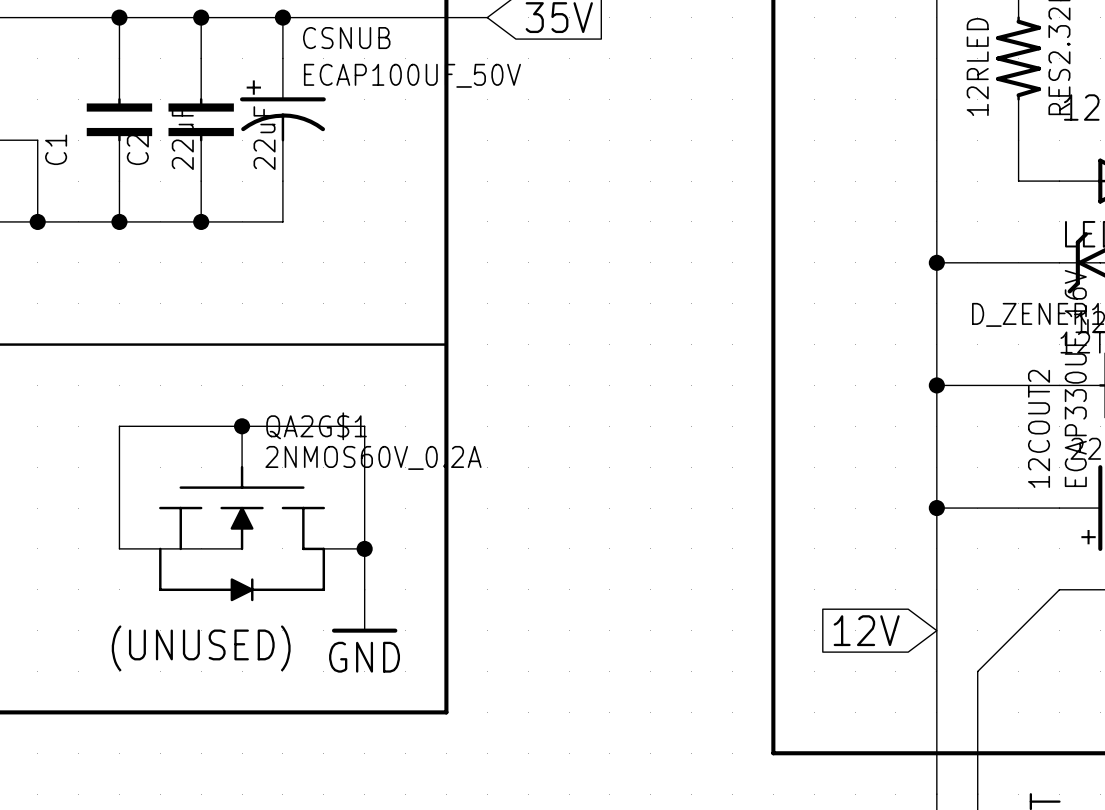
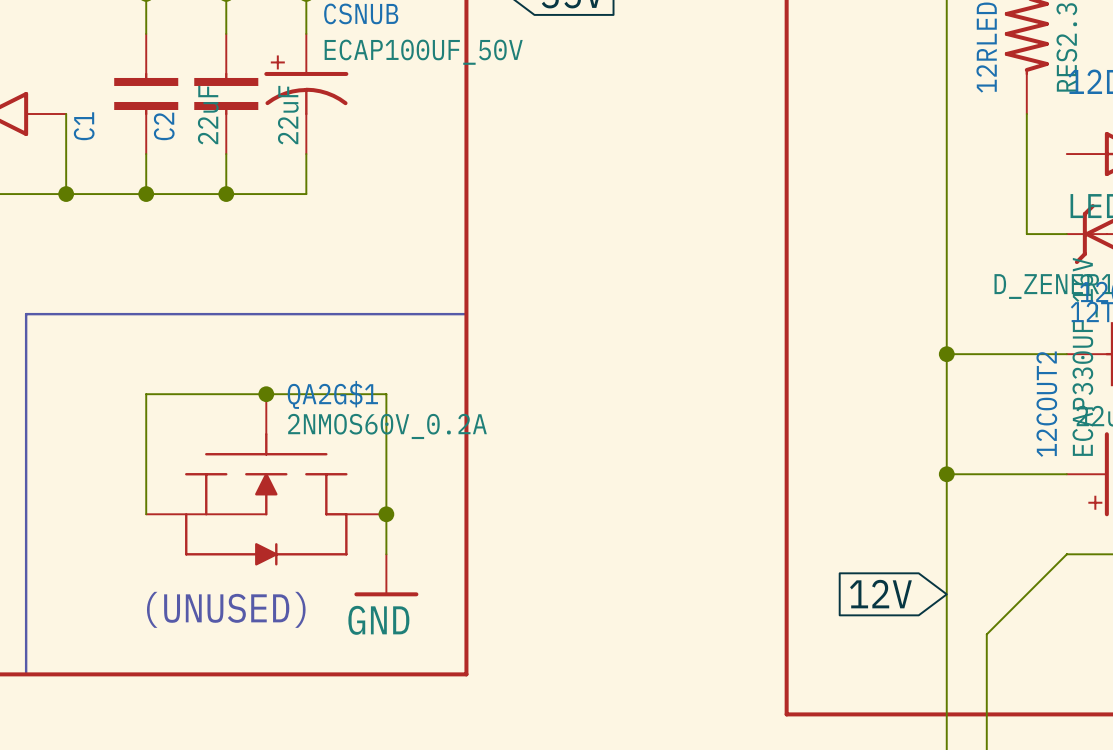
wire: (1018, 181) (1059, 181) -> (1026, 154) (1026, 234)
wire: (936, 262) (1018, 262) -> none
junction: (936, 262) -> none

